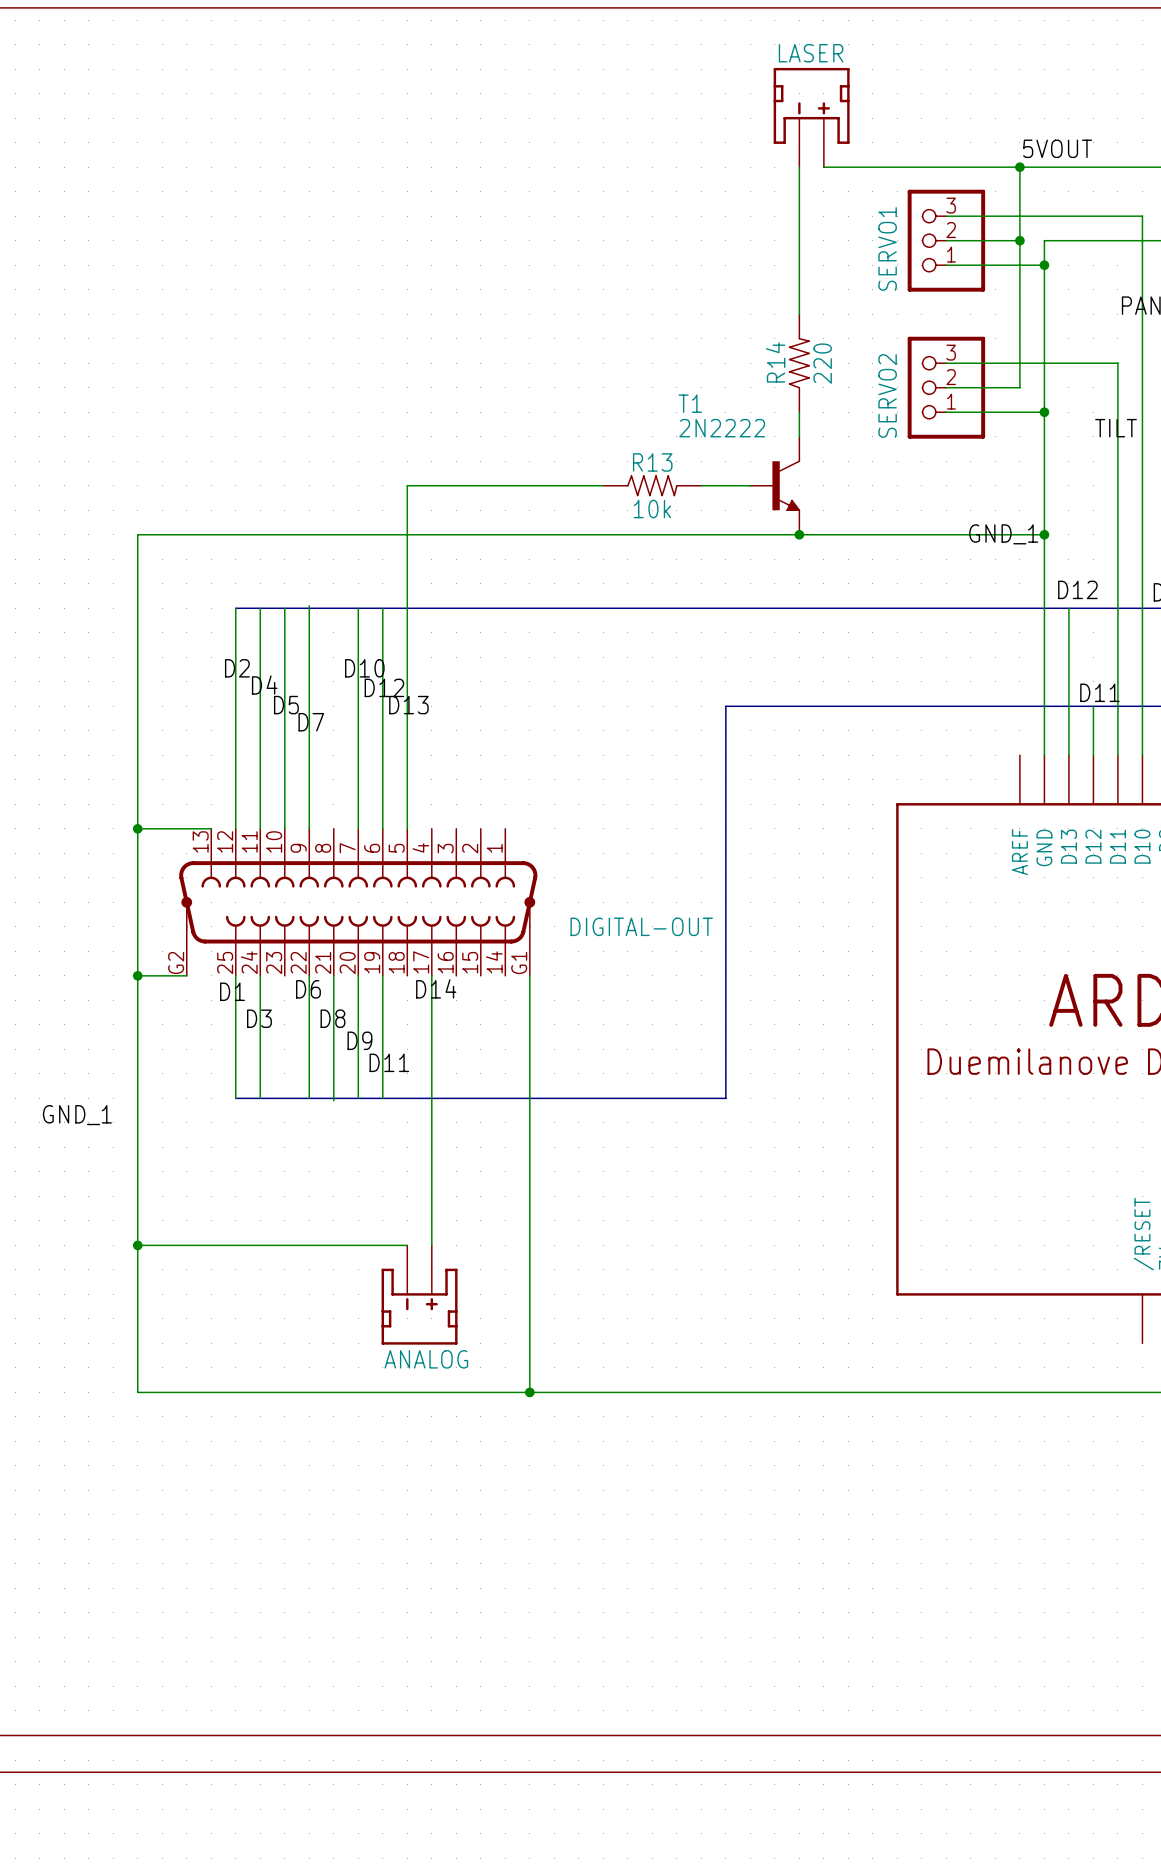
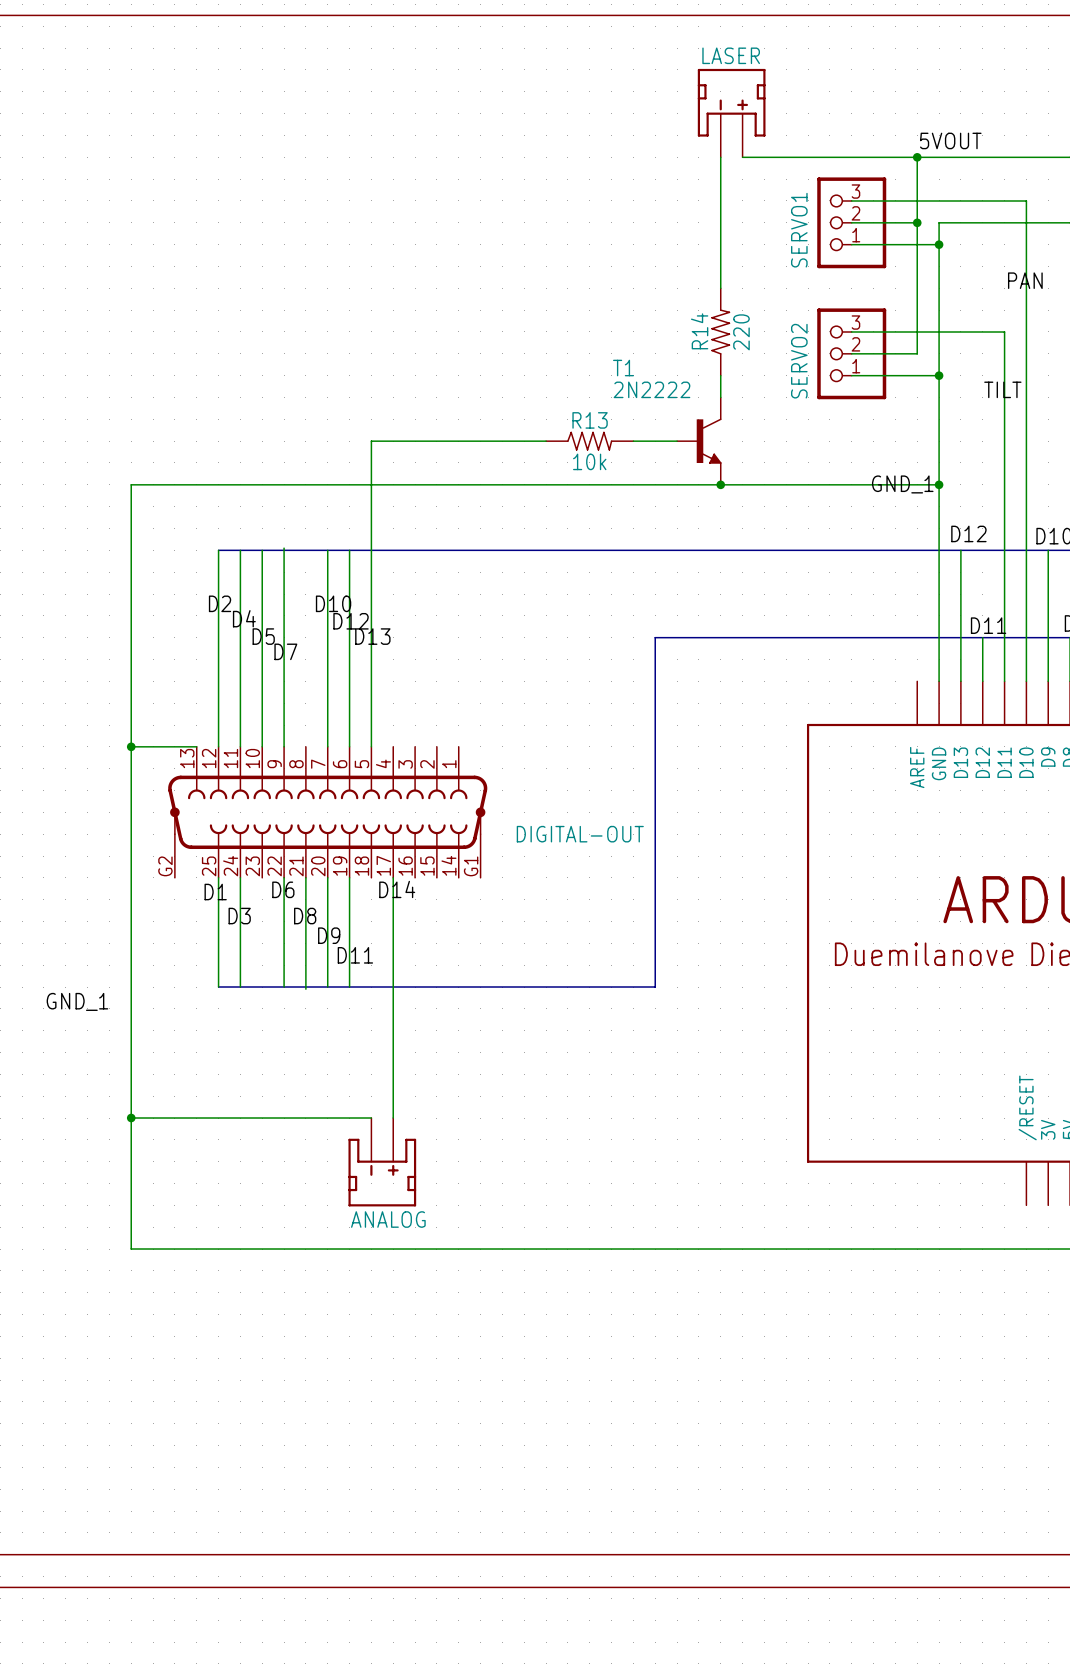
wire: (137, 975) (186, 975) -> none
junction: (137, 975) -> none
wire: (529, 975) (529, 1392) -> none
junction: (529, 1392) -> none

